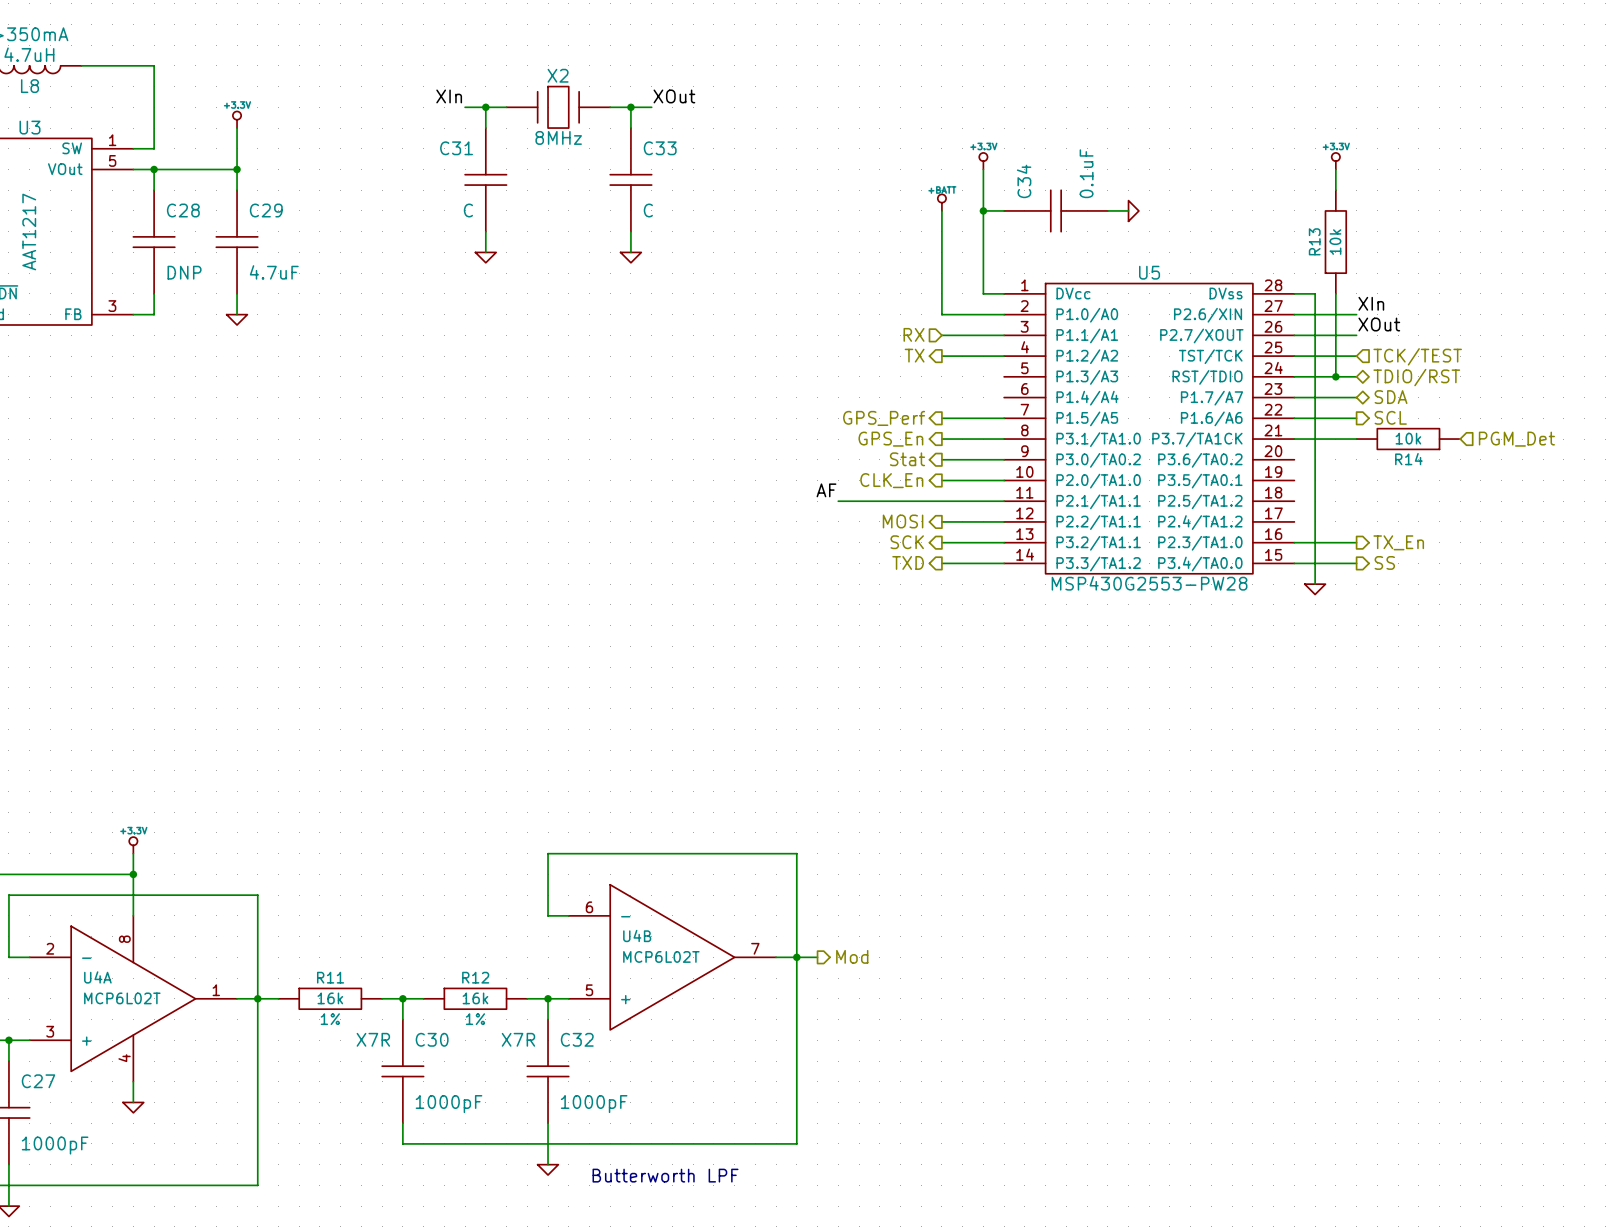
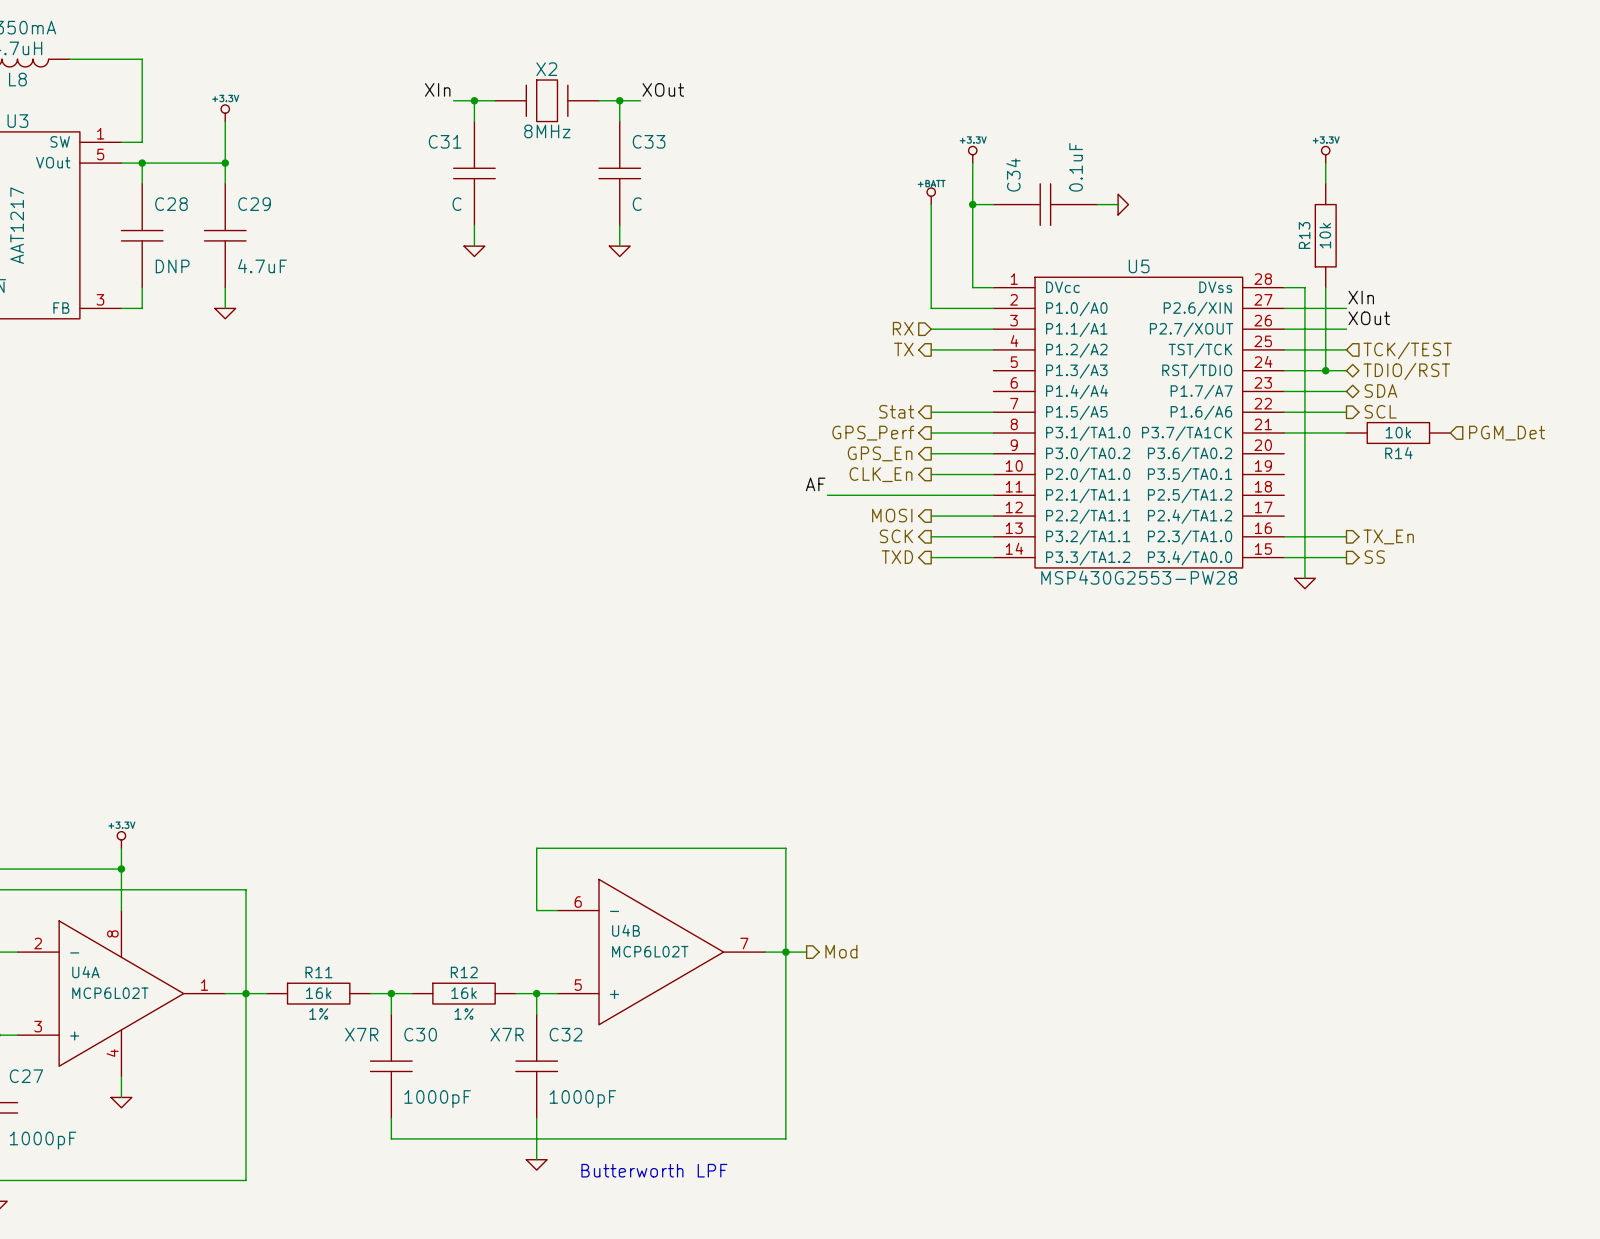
hierarchical label: GPS_Perf (884, 418) -> Stat (896, 411)
hierarchical label: GPS_En (890, 439) -> GPS_Perf (873, 433)
hierarchical label: Stat (907, 459) -> GPS_En (880, 453)

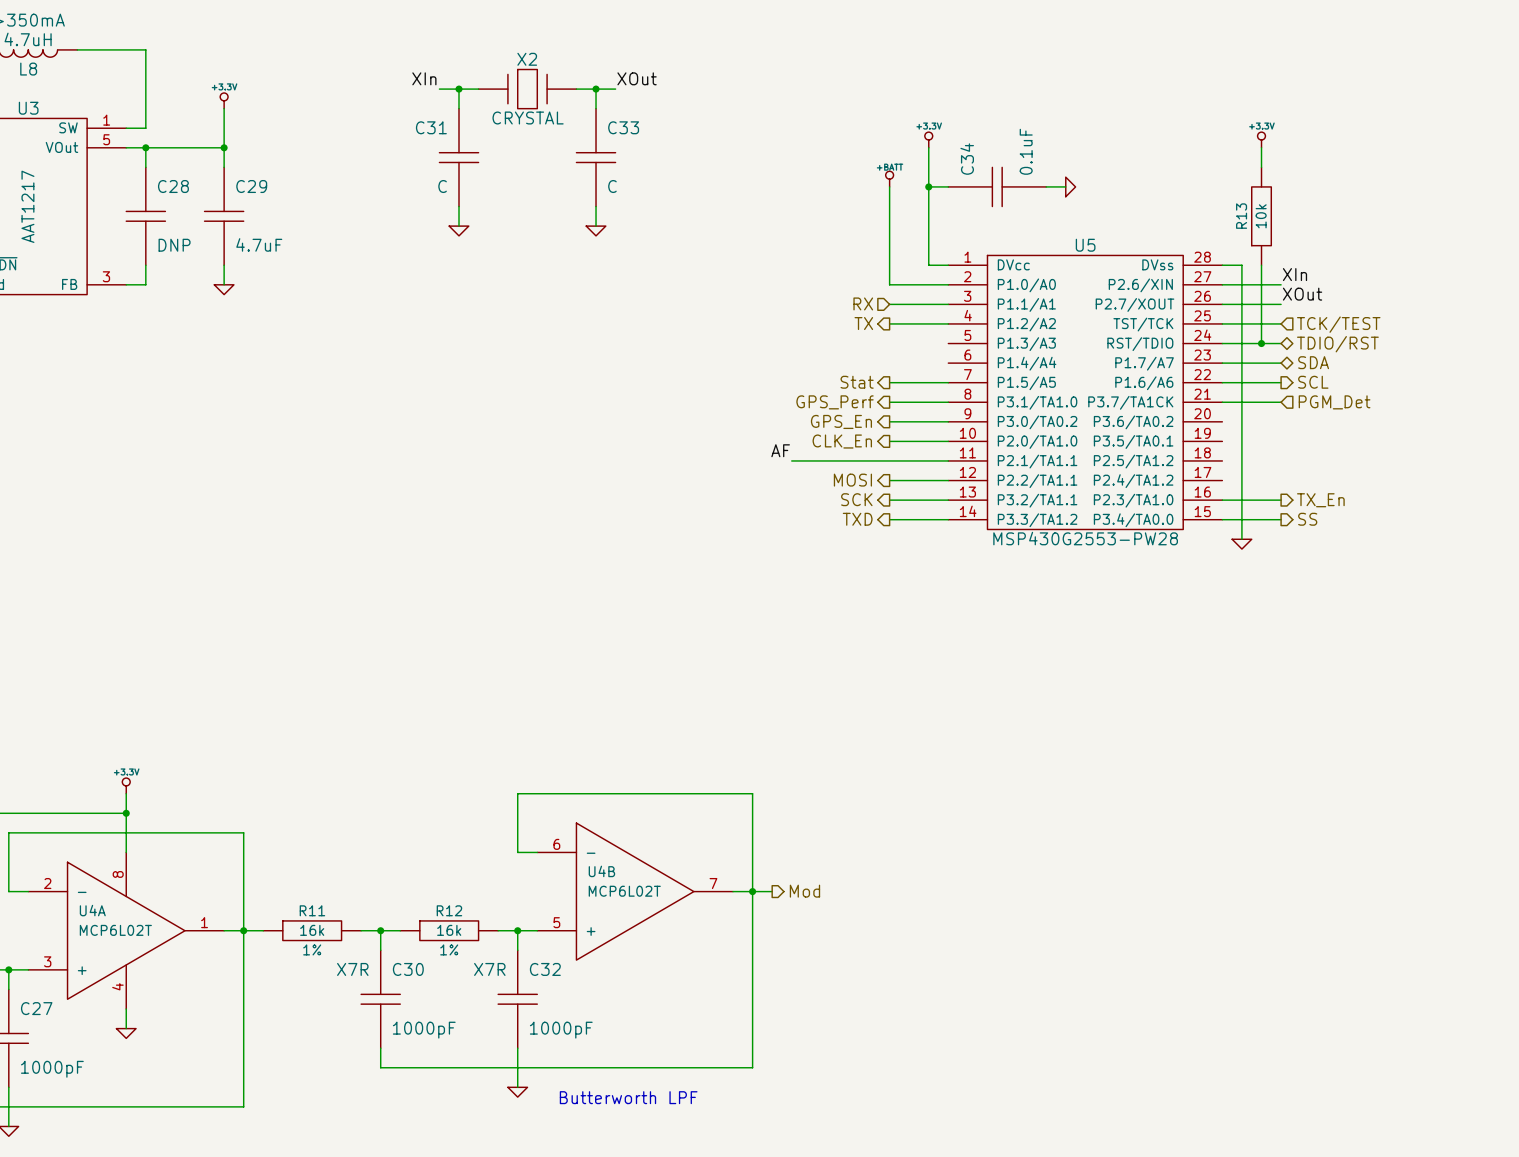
X2 value: 8MHz (547, 131) -> CRYSTAL (528, 118)
R14: 10k (1398, 432) -> none
hierarchical label position: PGM_Det (1507, 433) -> PGM_Det (1334, 402)

